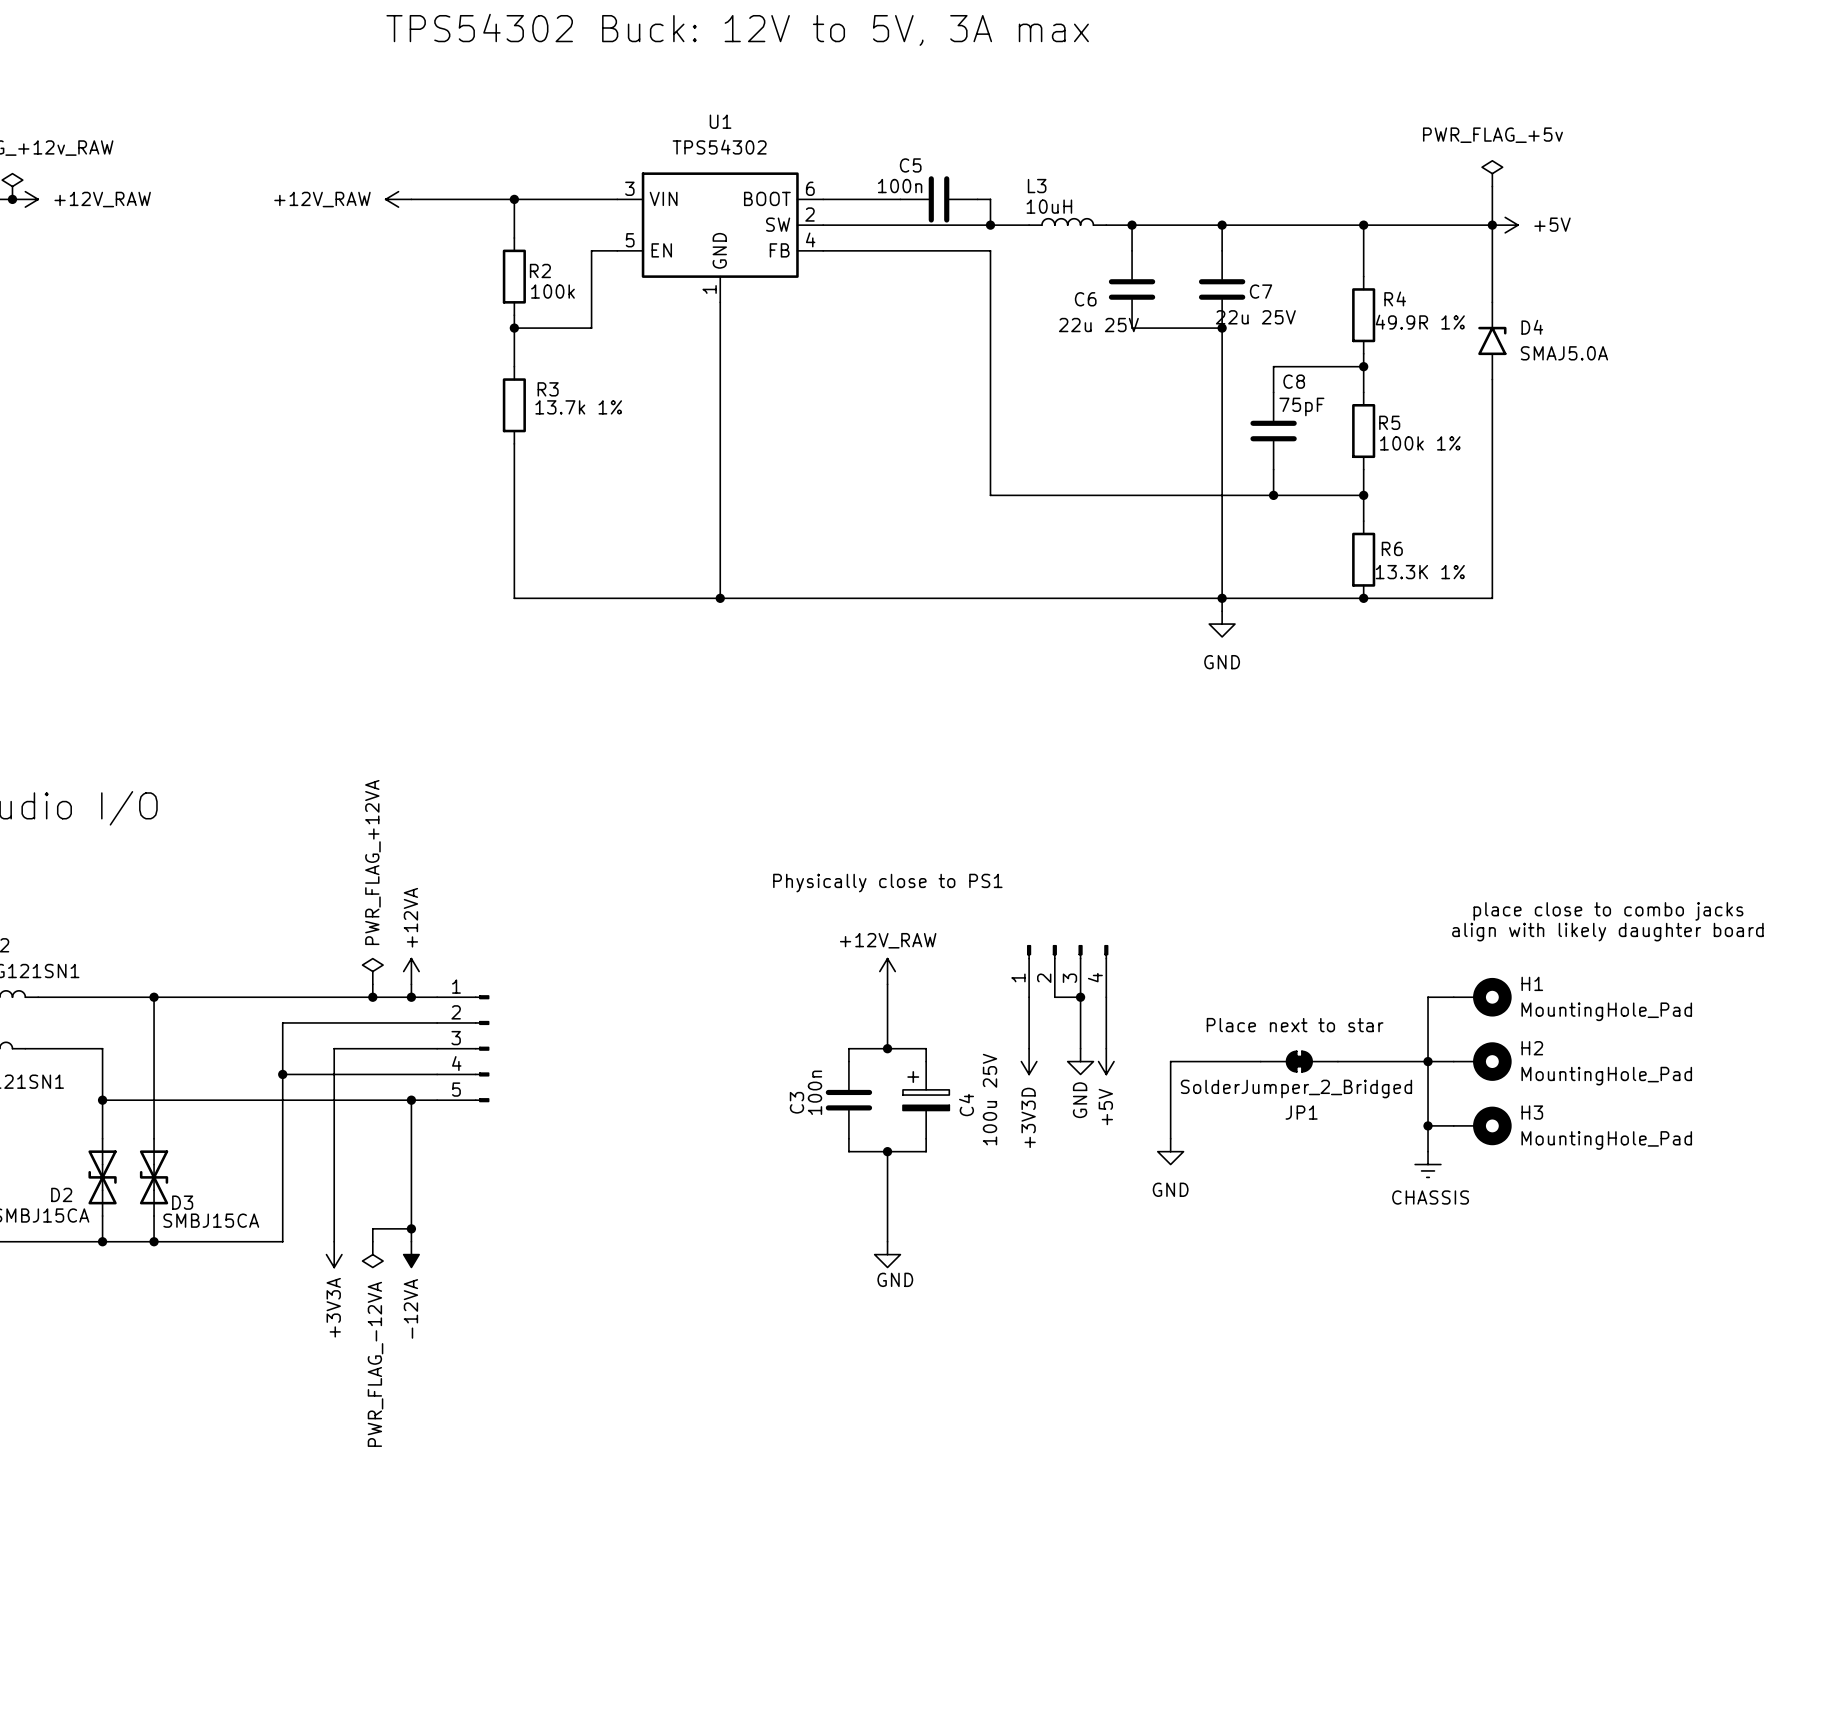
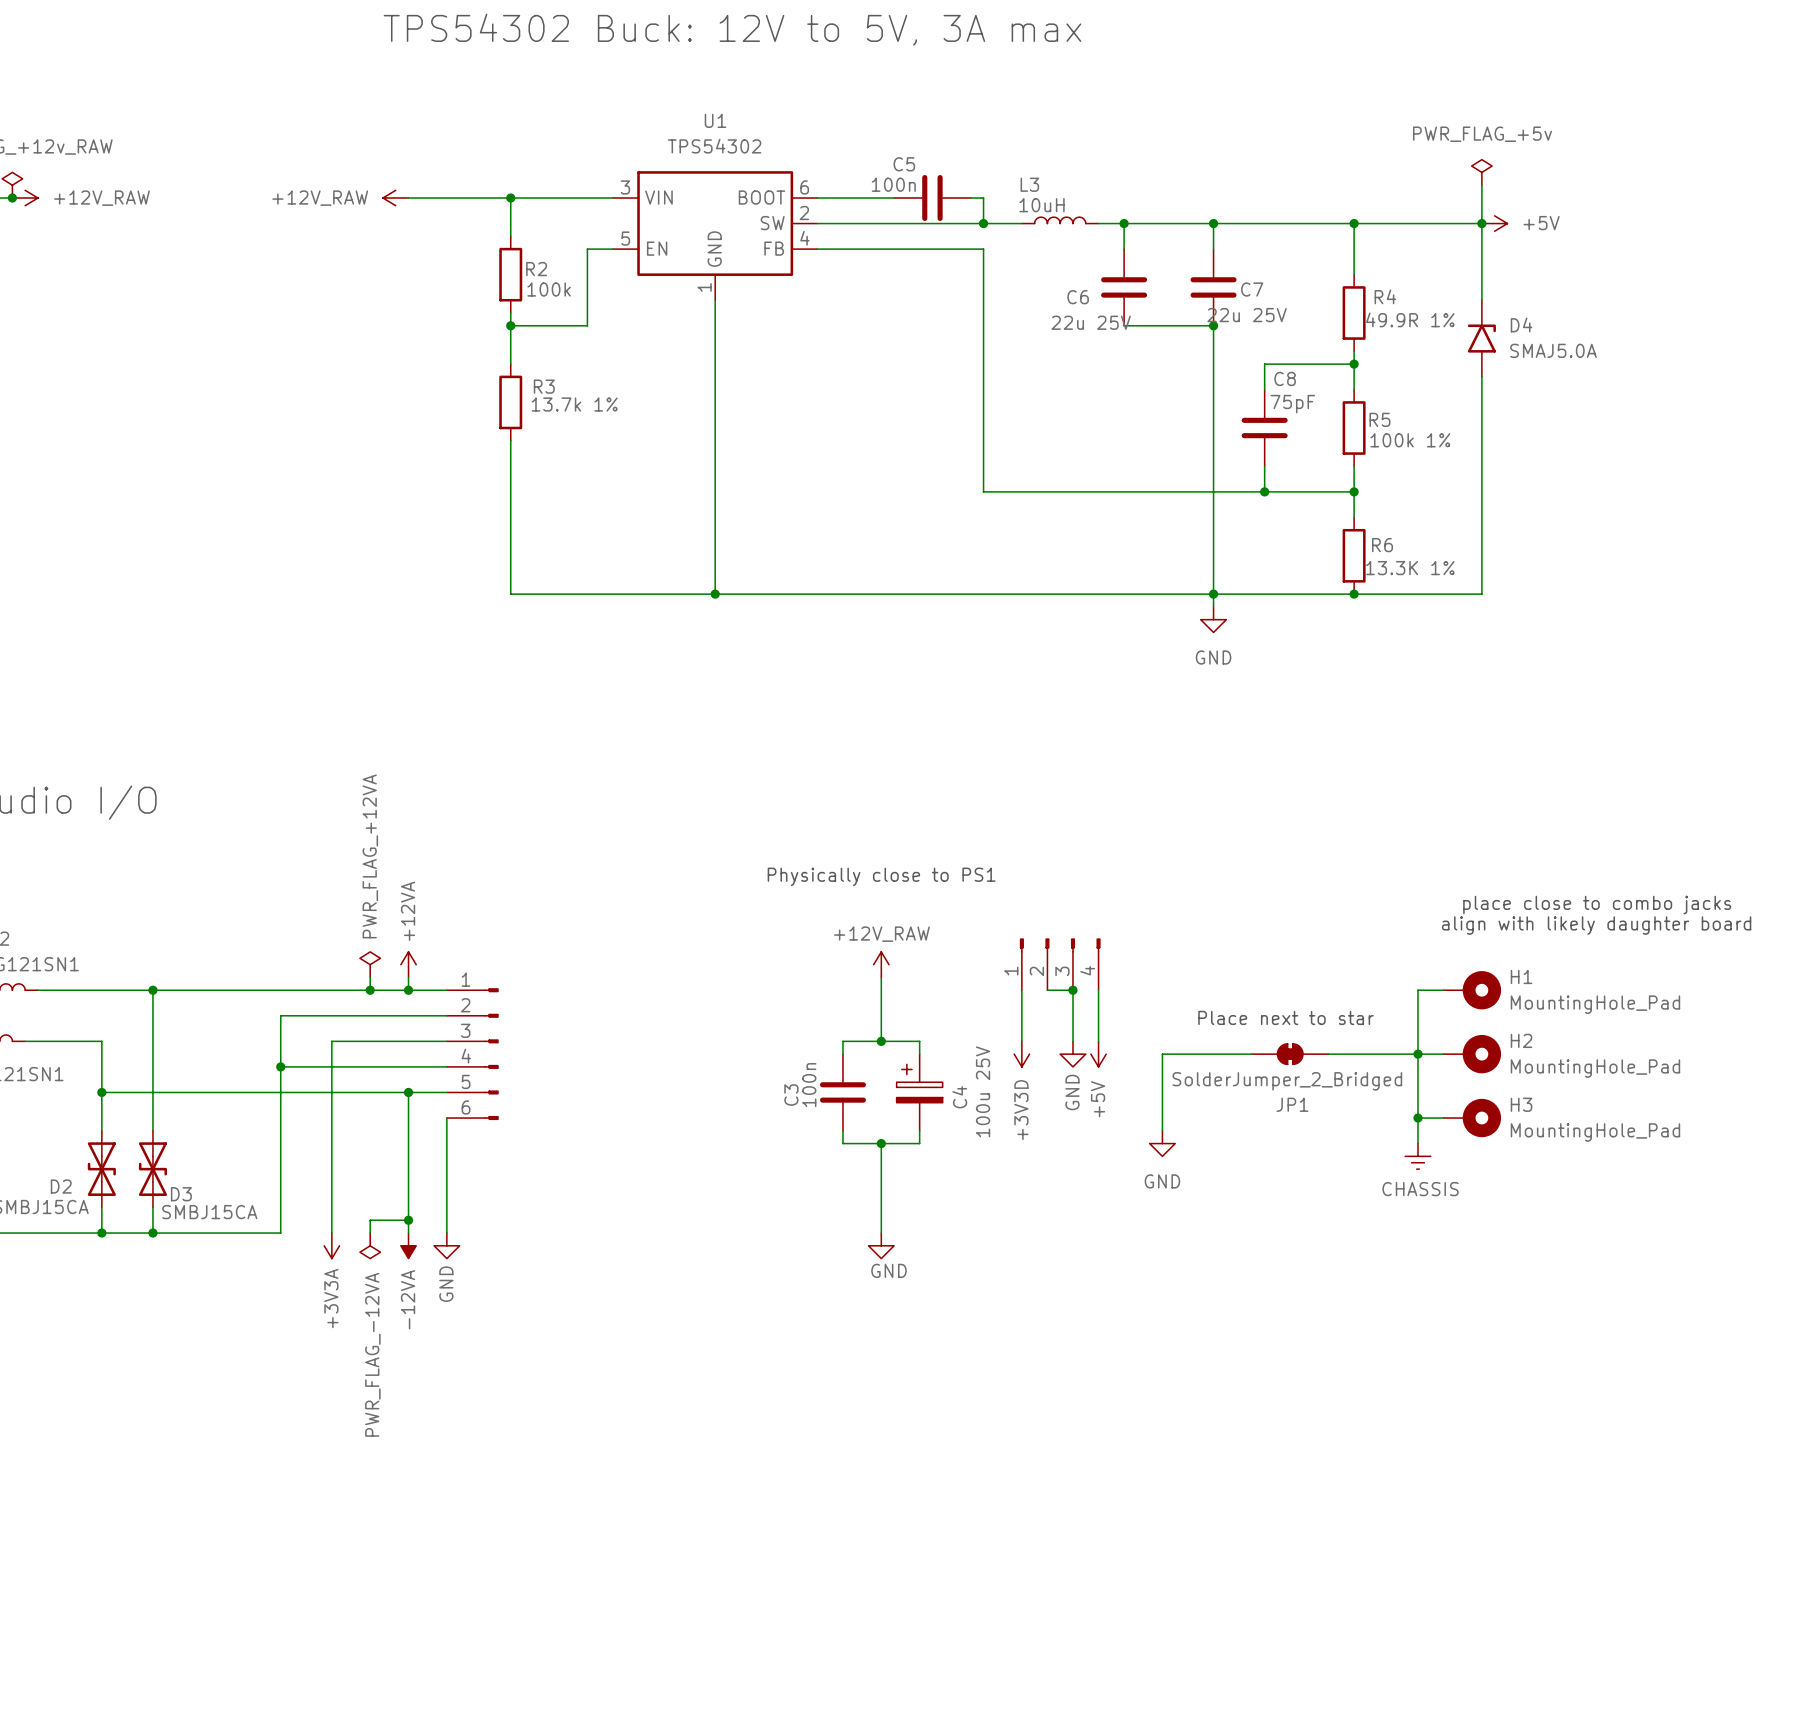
part: (463, 1048) -> none
part: none -> (472, 1054)
wire: none -> (446, 1118) (446, 1233)
power symbol: none -> GND (446, 1245)

